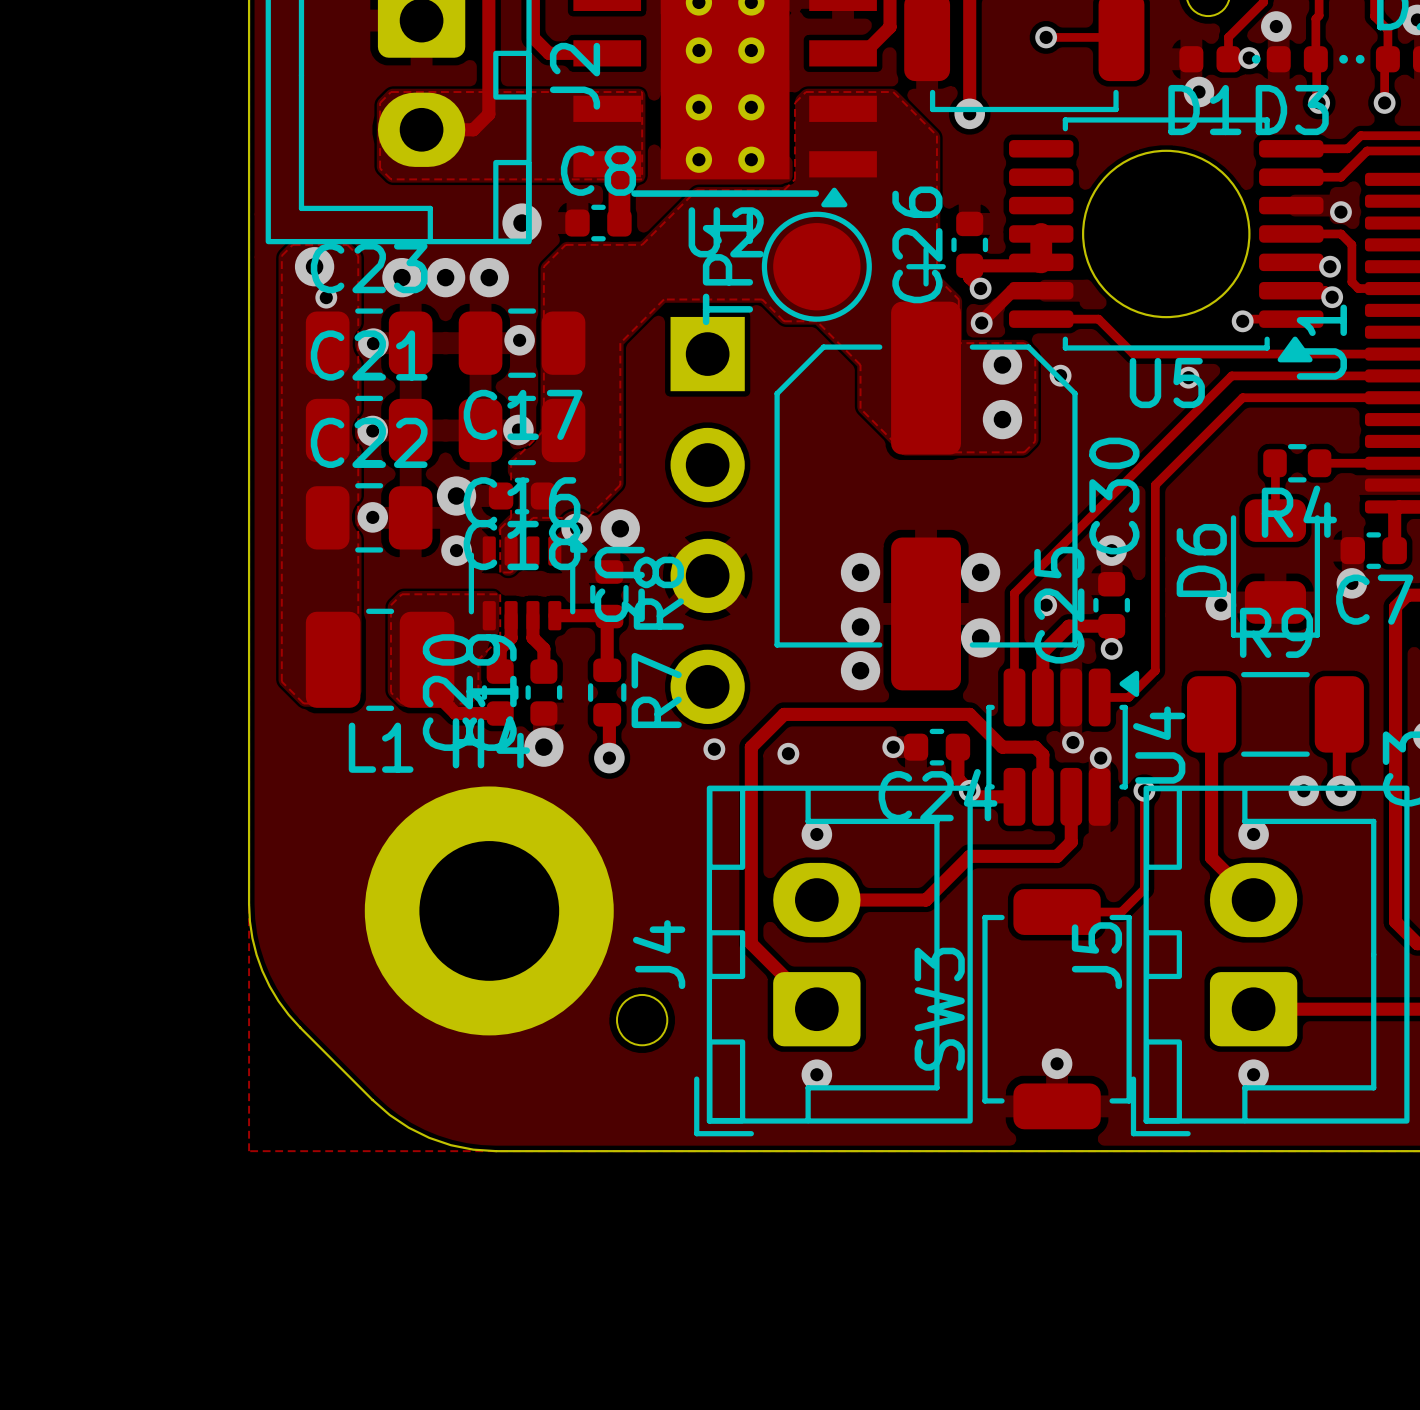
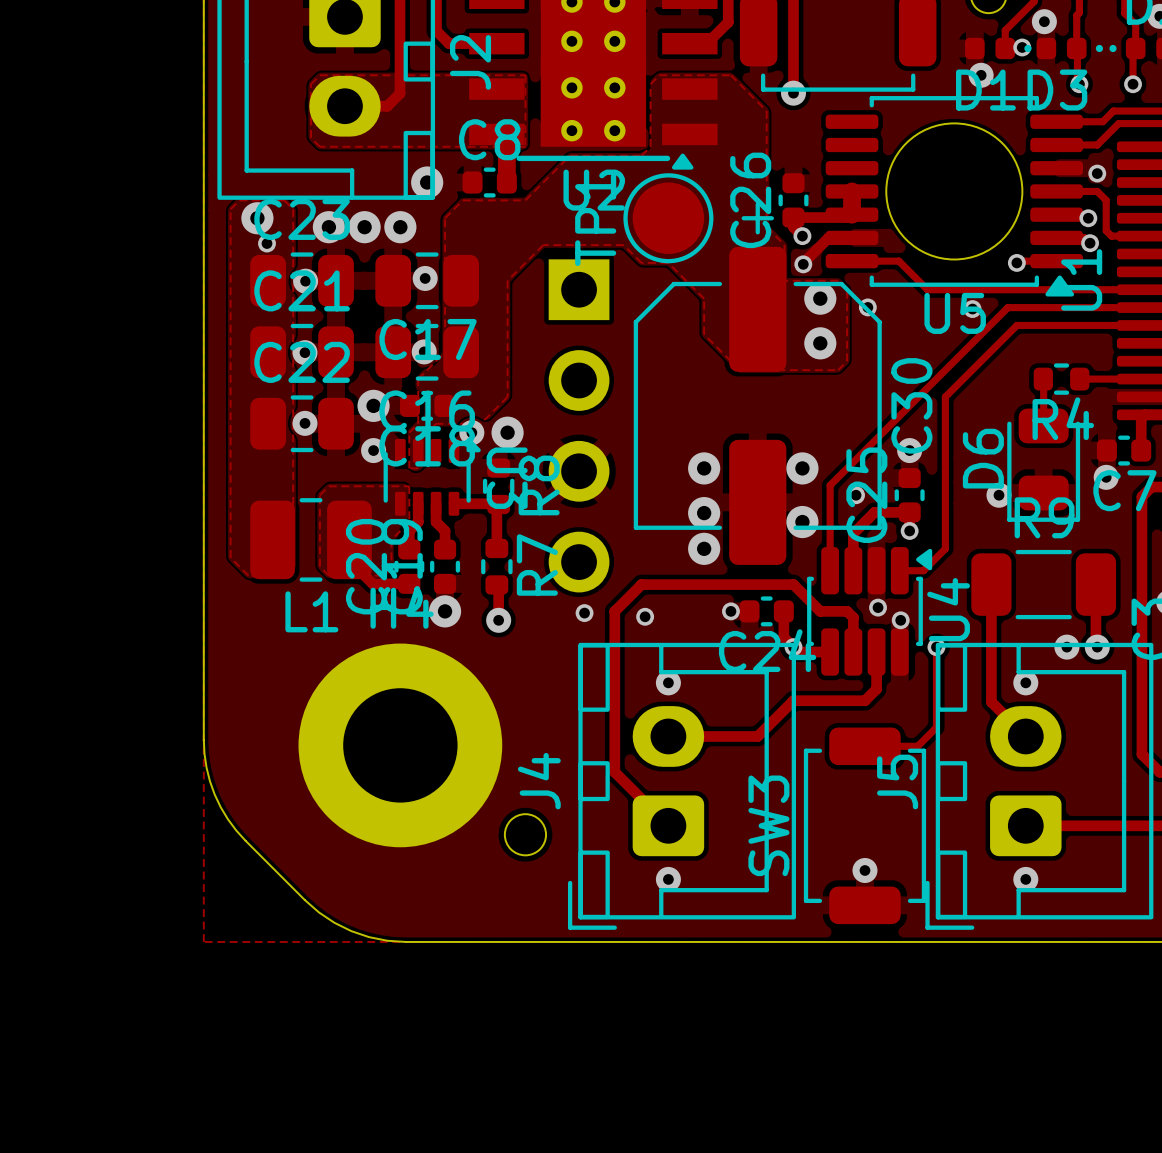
track: (1046, 37) (1121, 37) -> none
via: (1046, 37) -> none

